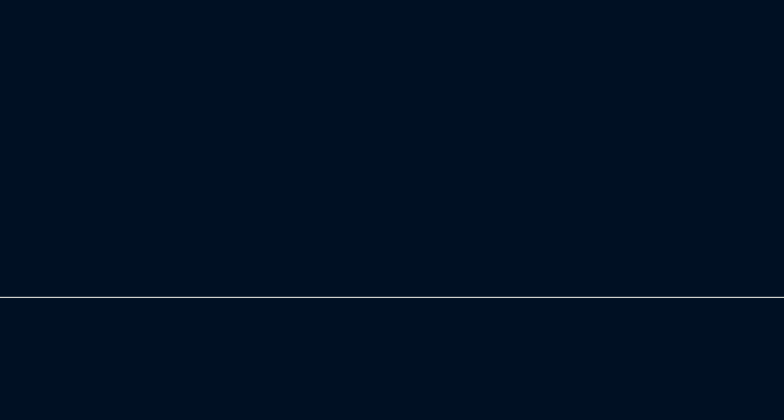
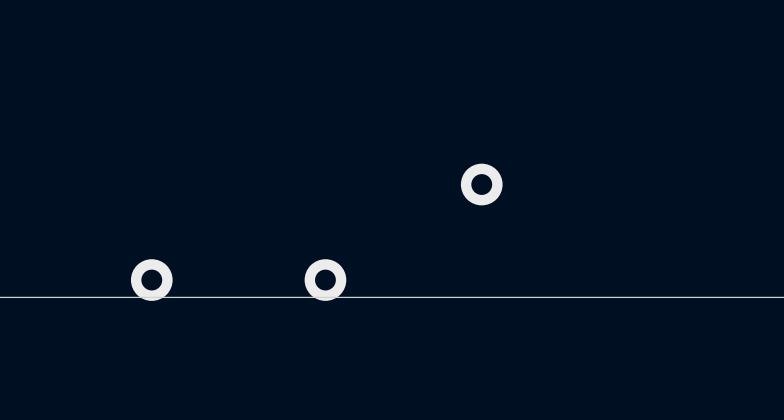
via: none -> (481, 184)
via: none -> (151, 280)
via: none -> (325, 280)

